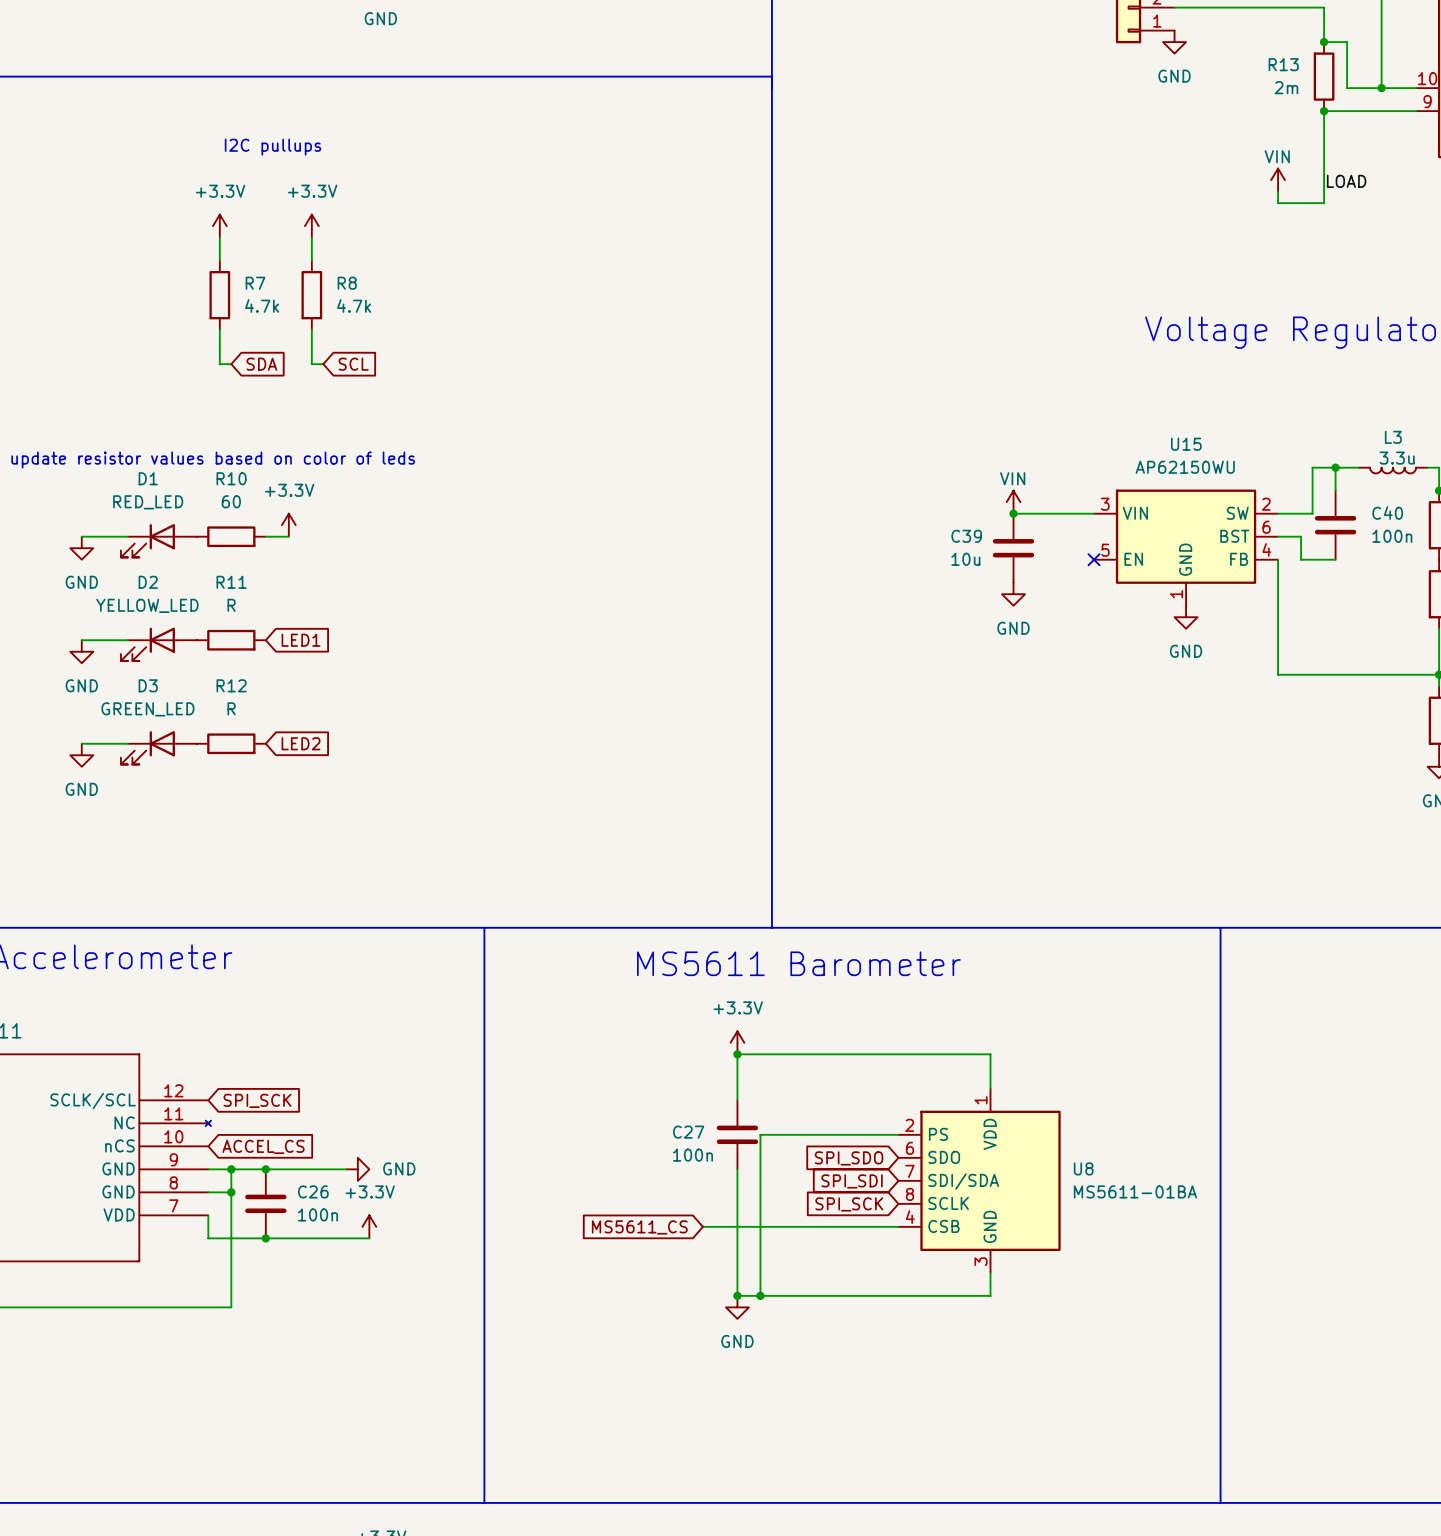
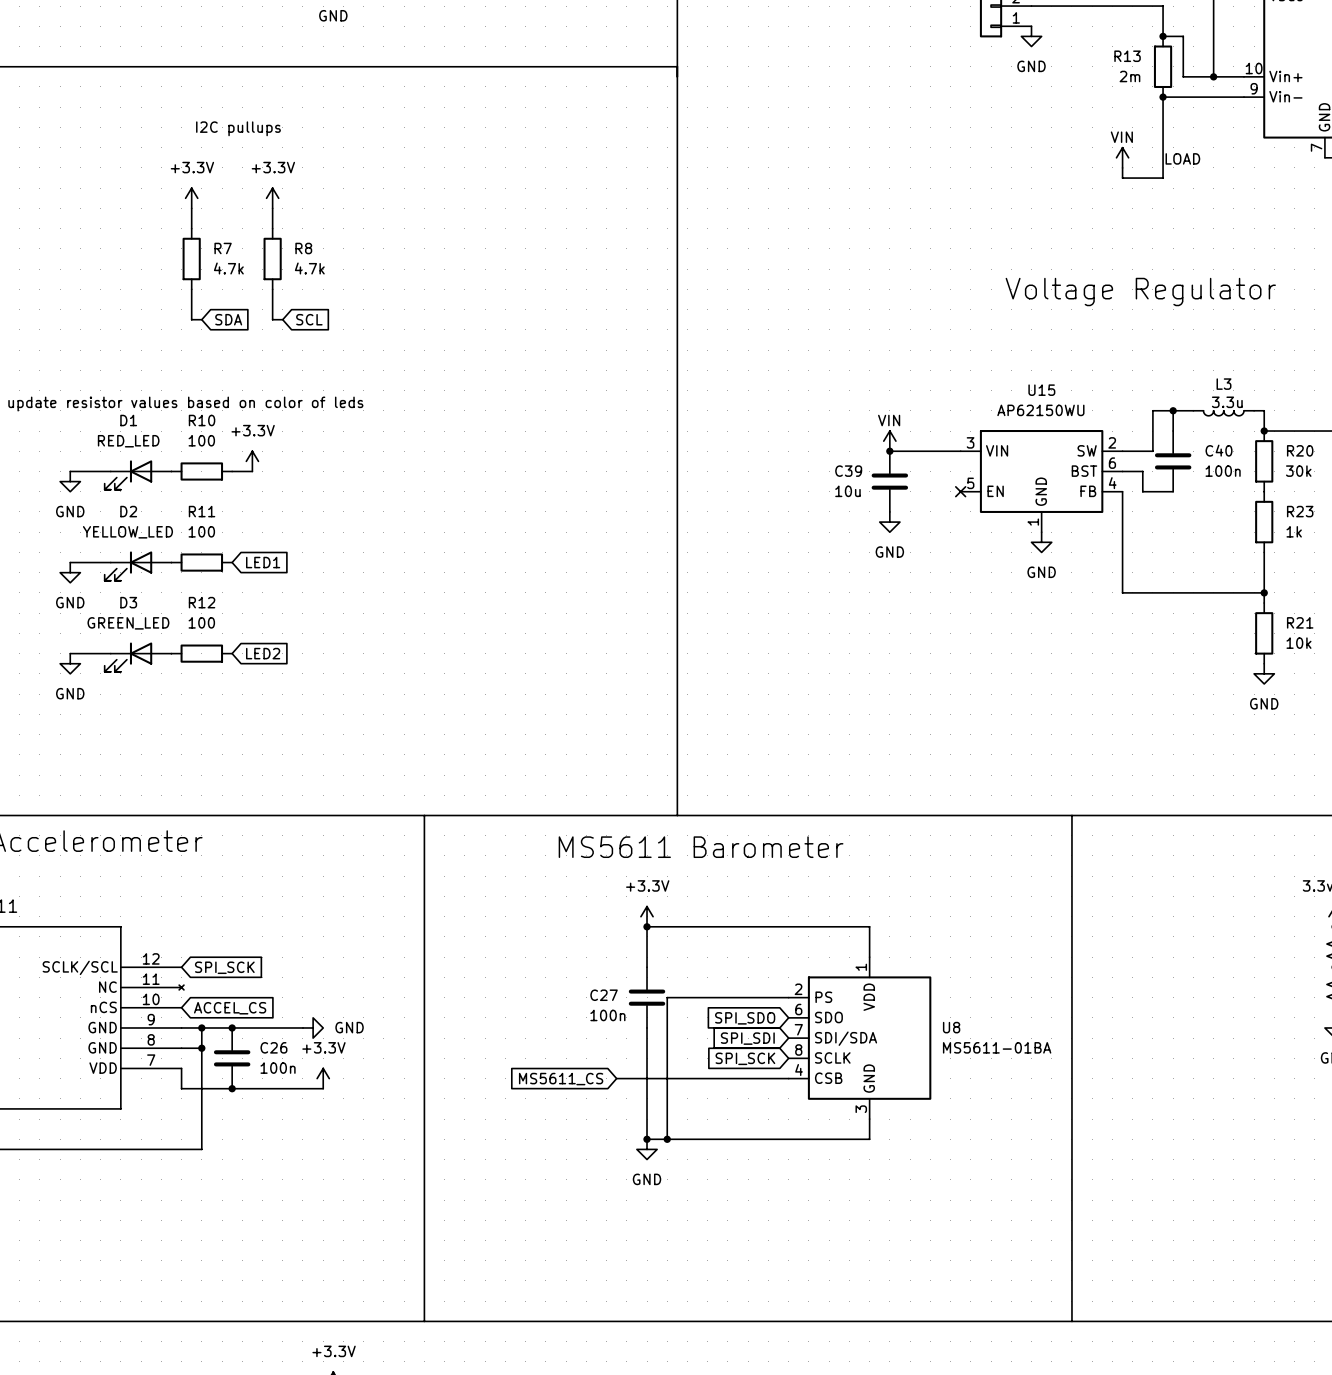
R10 value: 60 (231, 501) -> 100 (201, 440)
R11 value: R (231, 605) -> 100 (201, 531)
R12 value: R (231, 708) -> 100 (201, 622)

